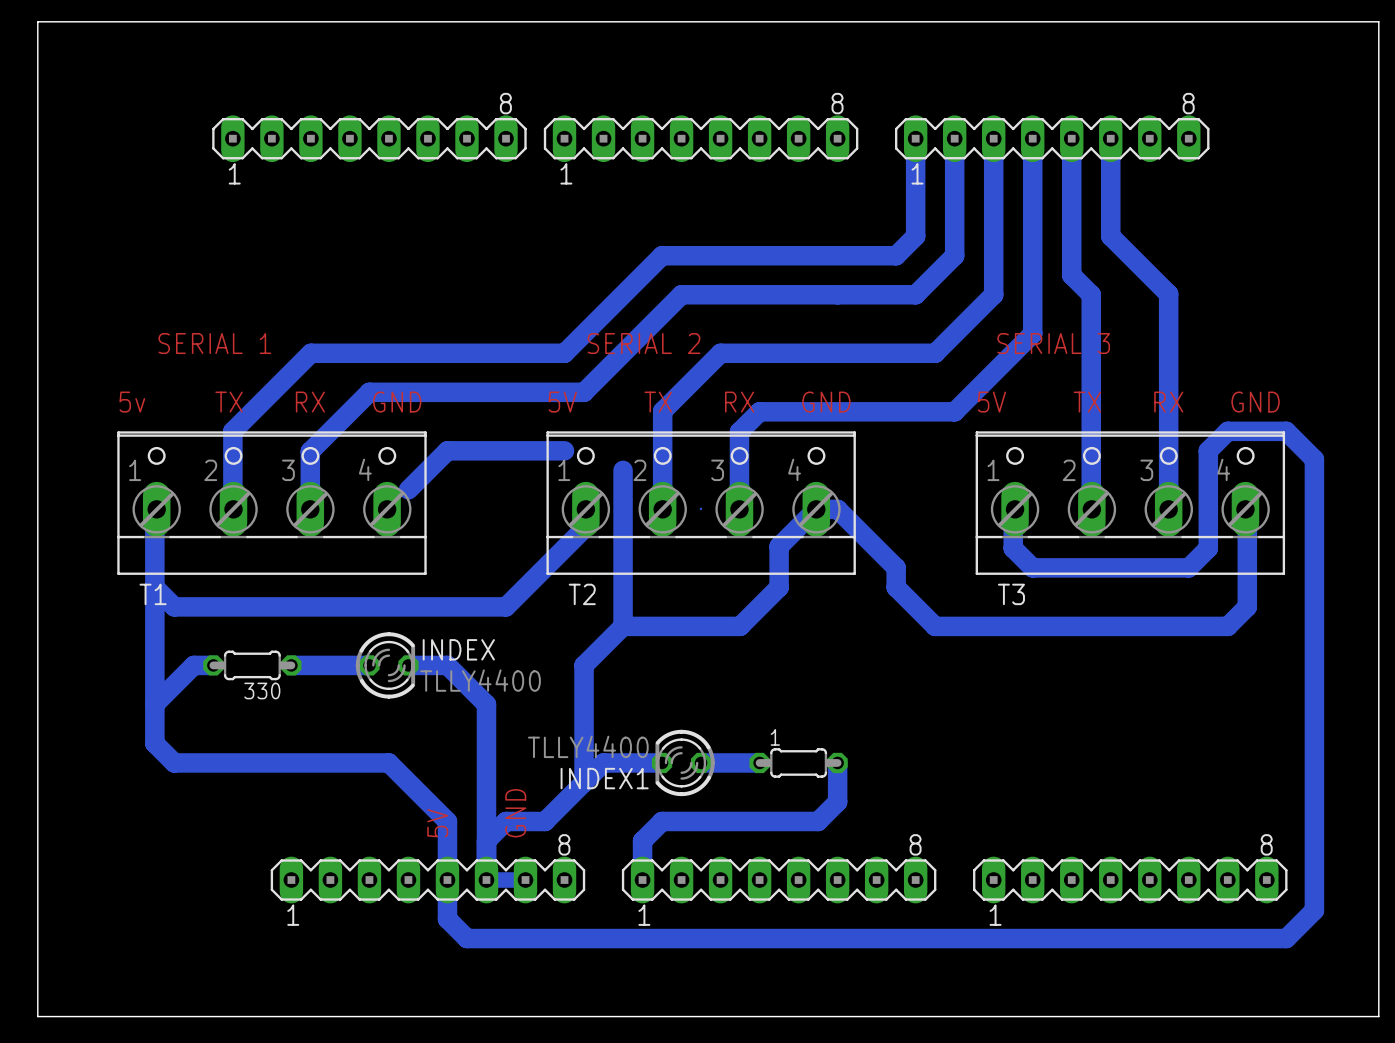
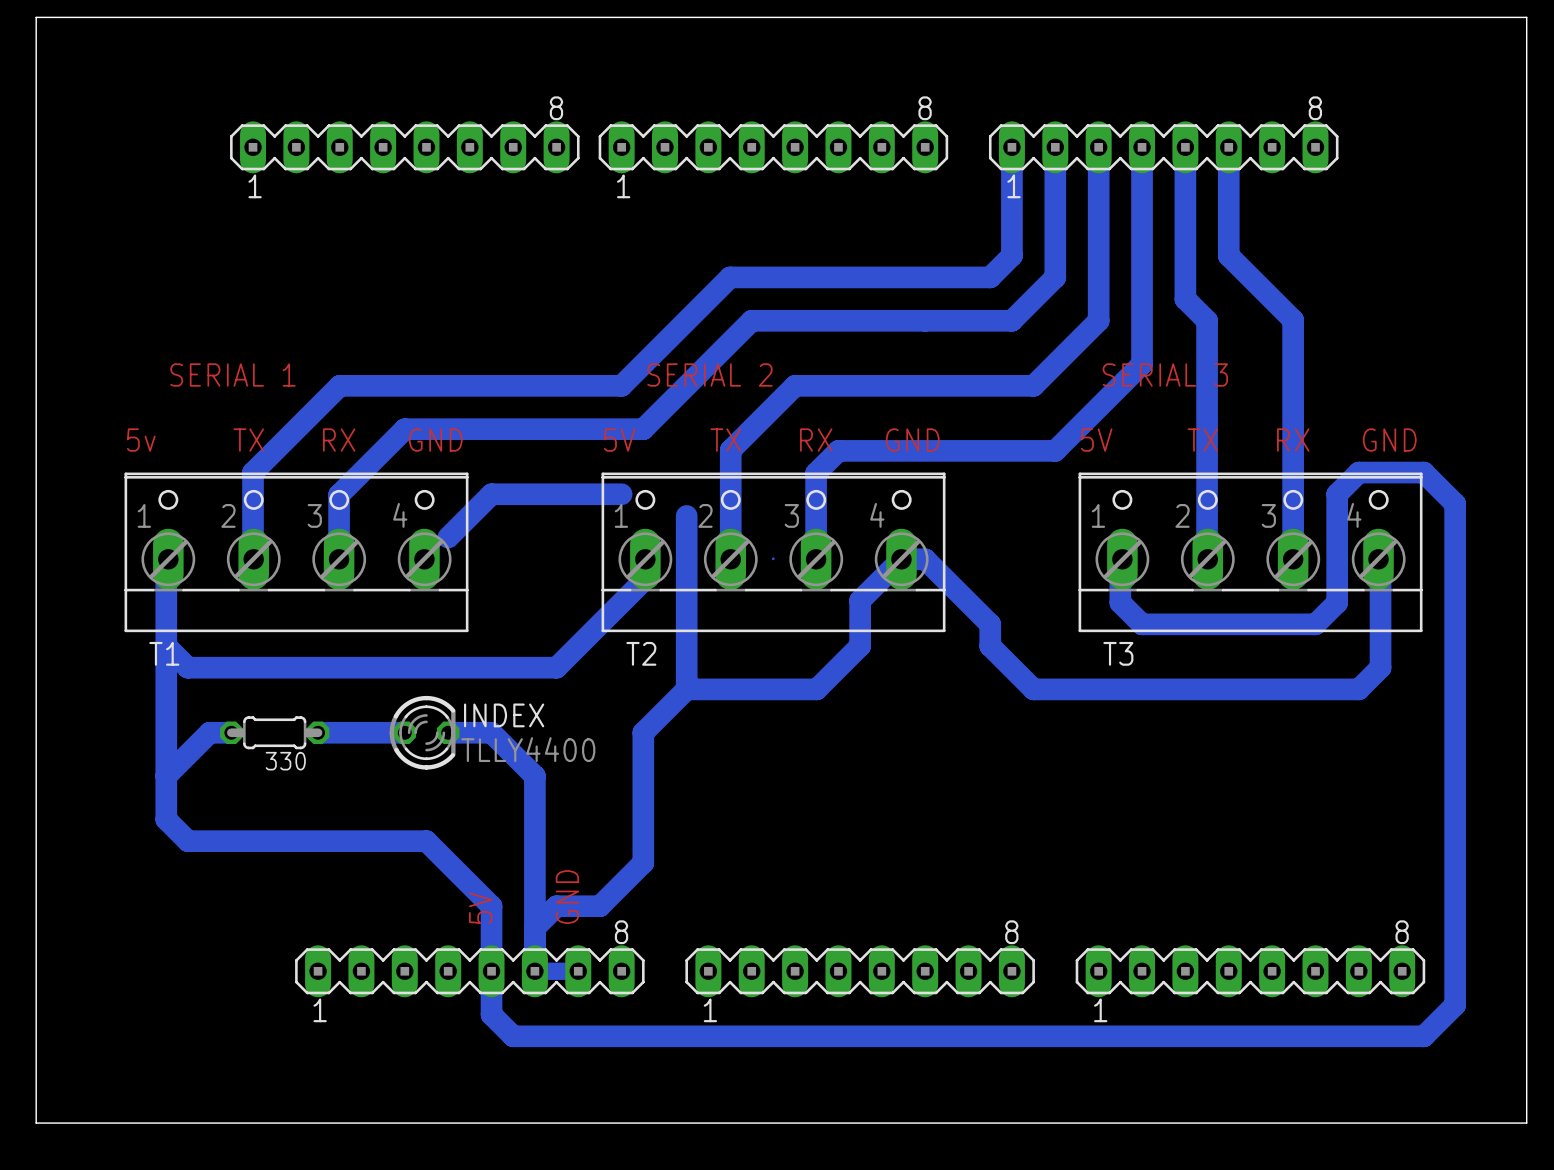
bottom track: (662, 762) (603, 762) (584, 782) -> none
INDEX1: TLLY4400 (683, 762) -> none
bottom track: (701, 762) (759, 762) -> none
1: (798, 762) -> none
bottom track: (837, 762) (837, 801) (818, 821) (662, 821) (642, 841) (642, 880) -> none

